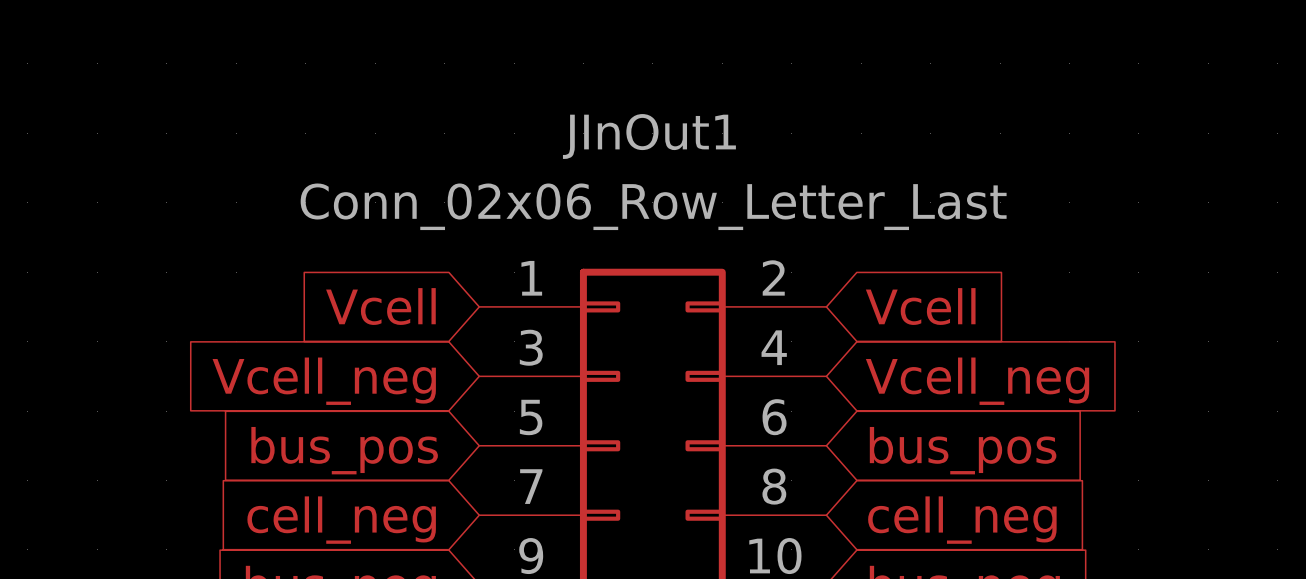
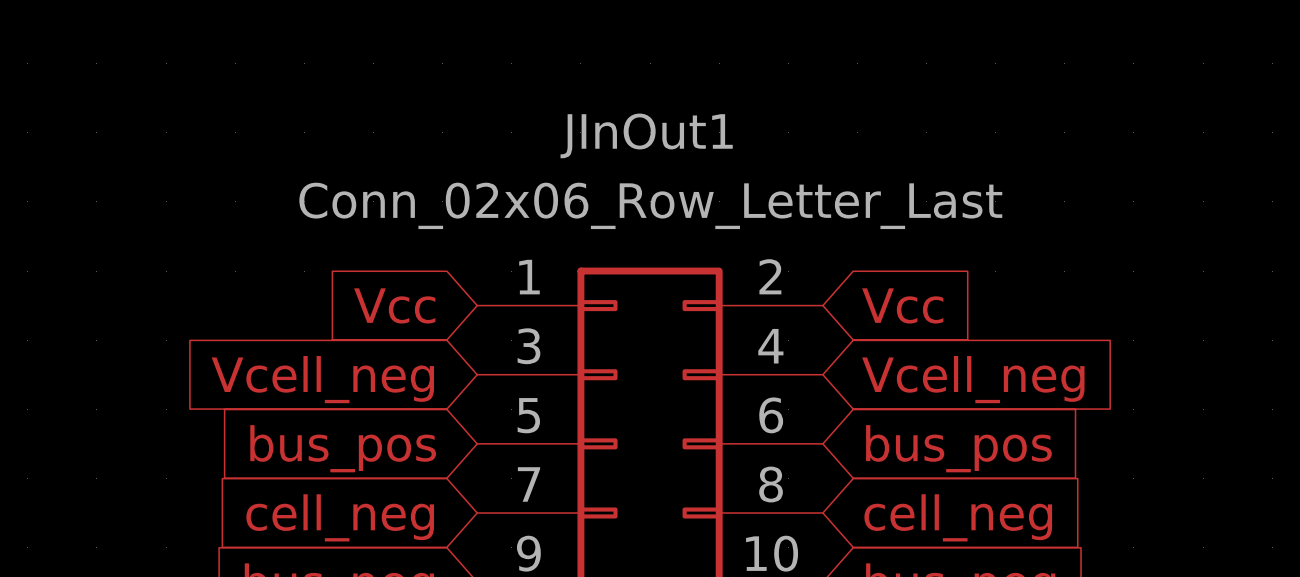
global label: Vcell (380, 306) -> Vcc (394, 305)
global label: Vcell (920, 306) -> Vcc (902, 305)

